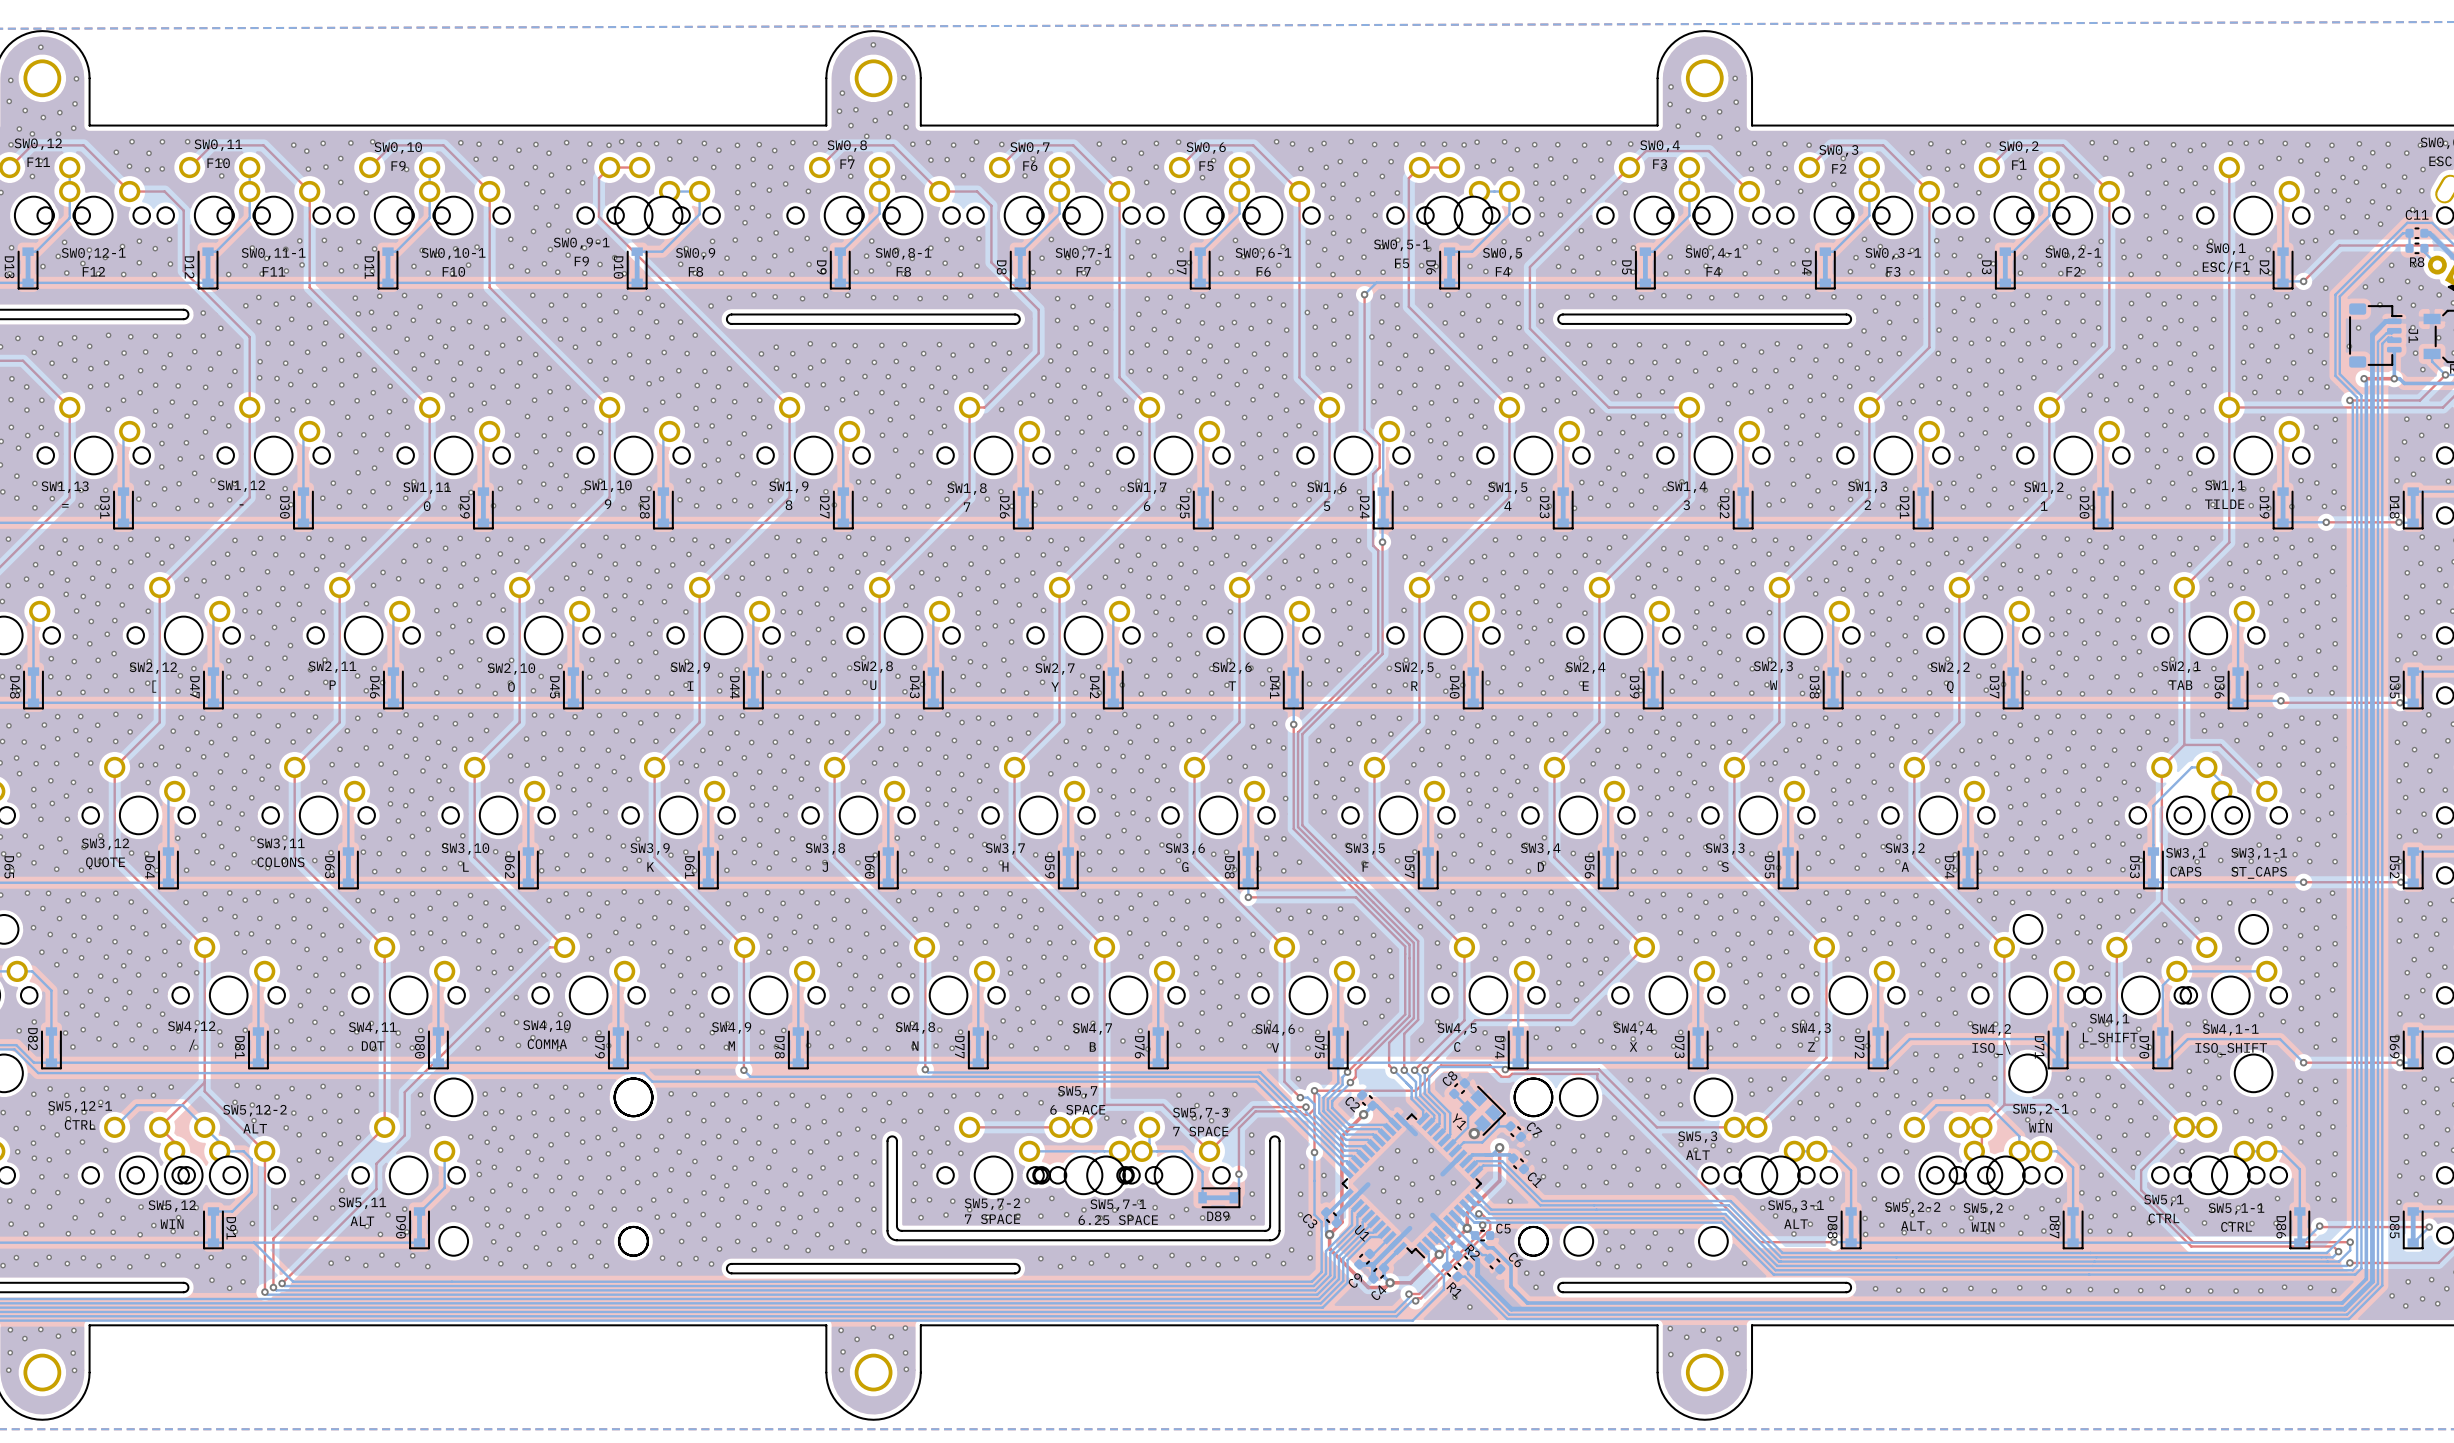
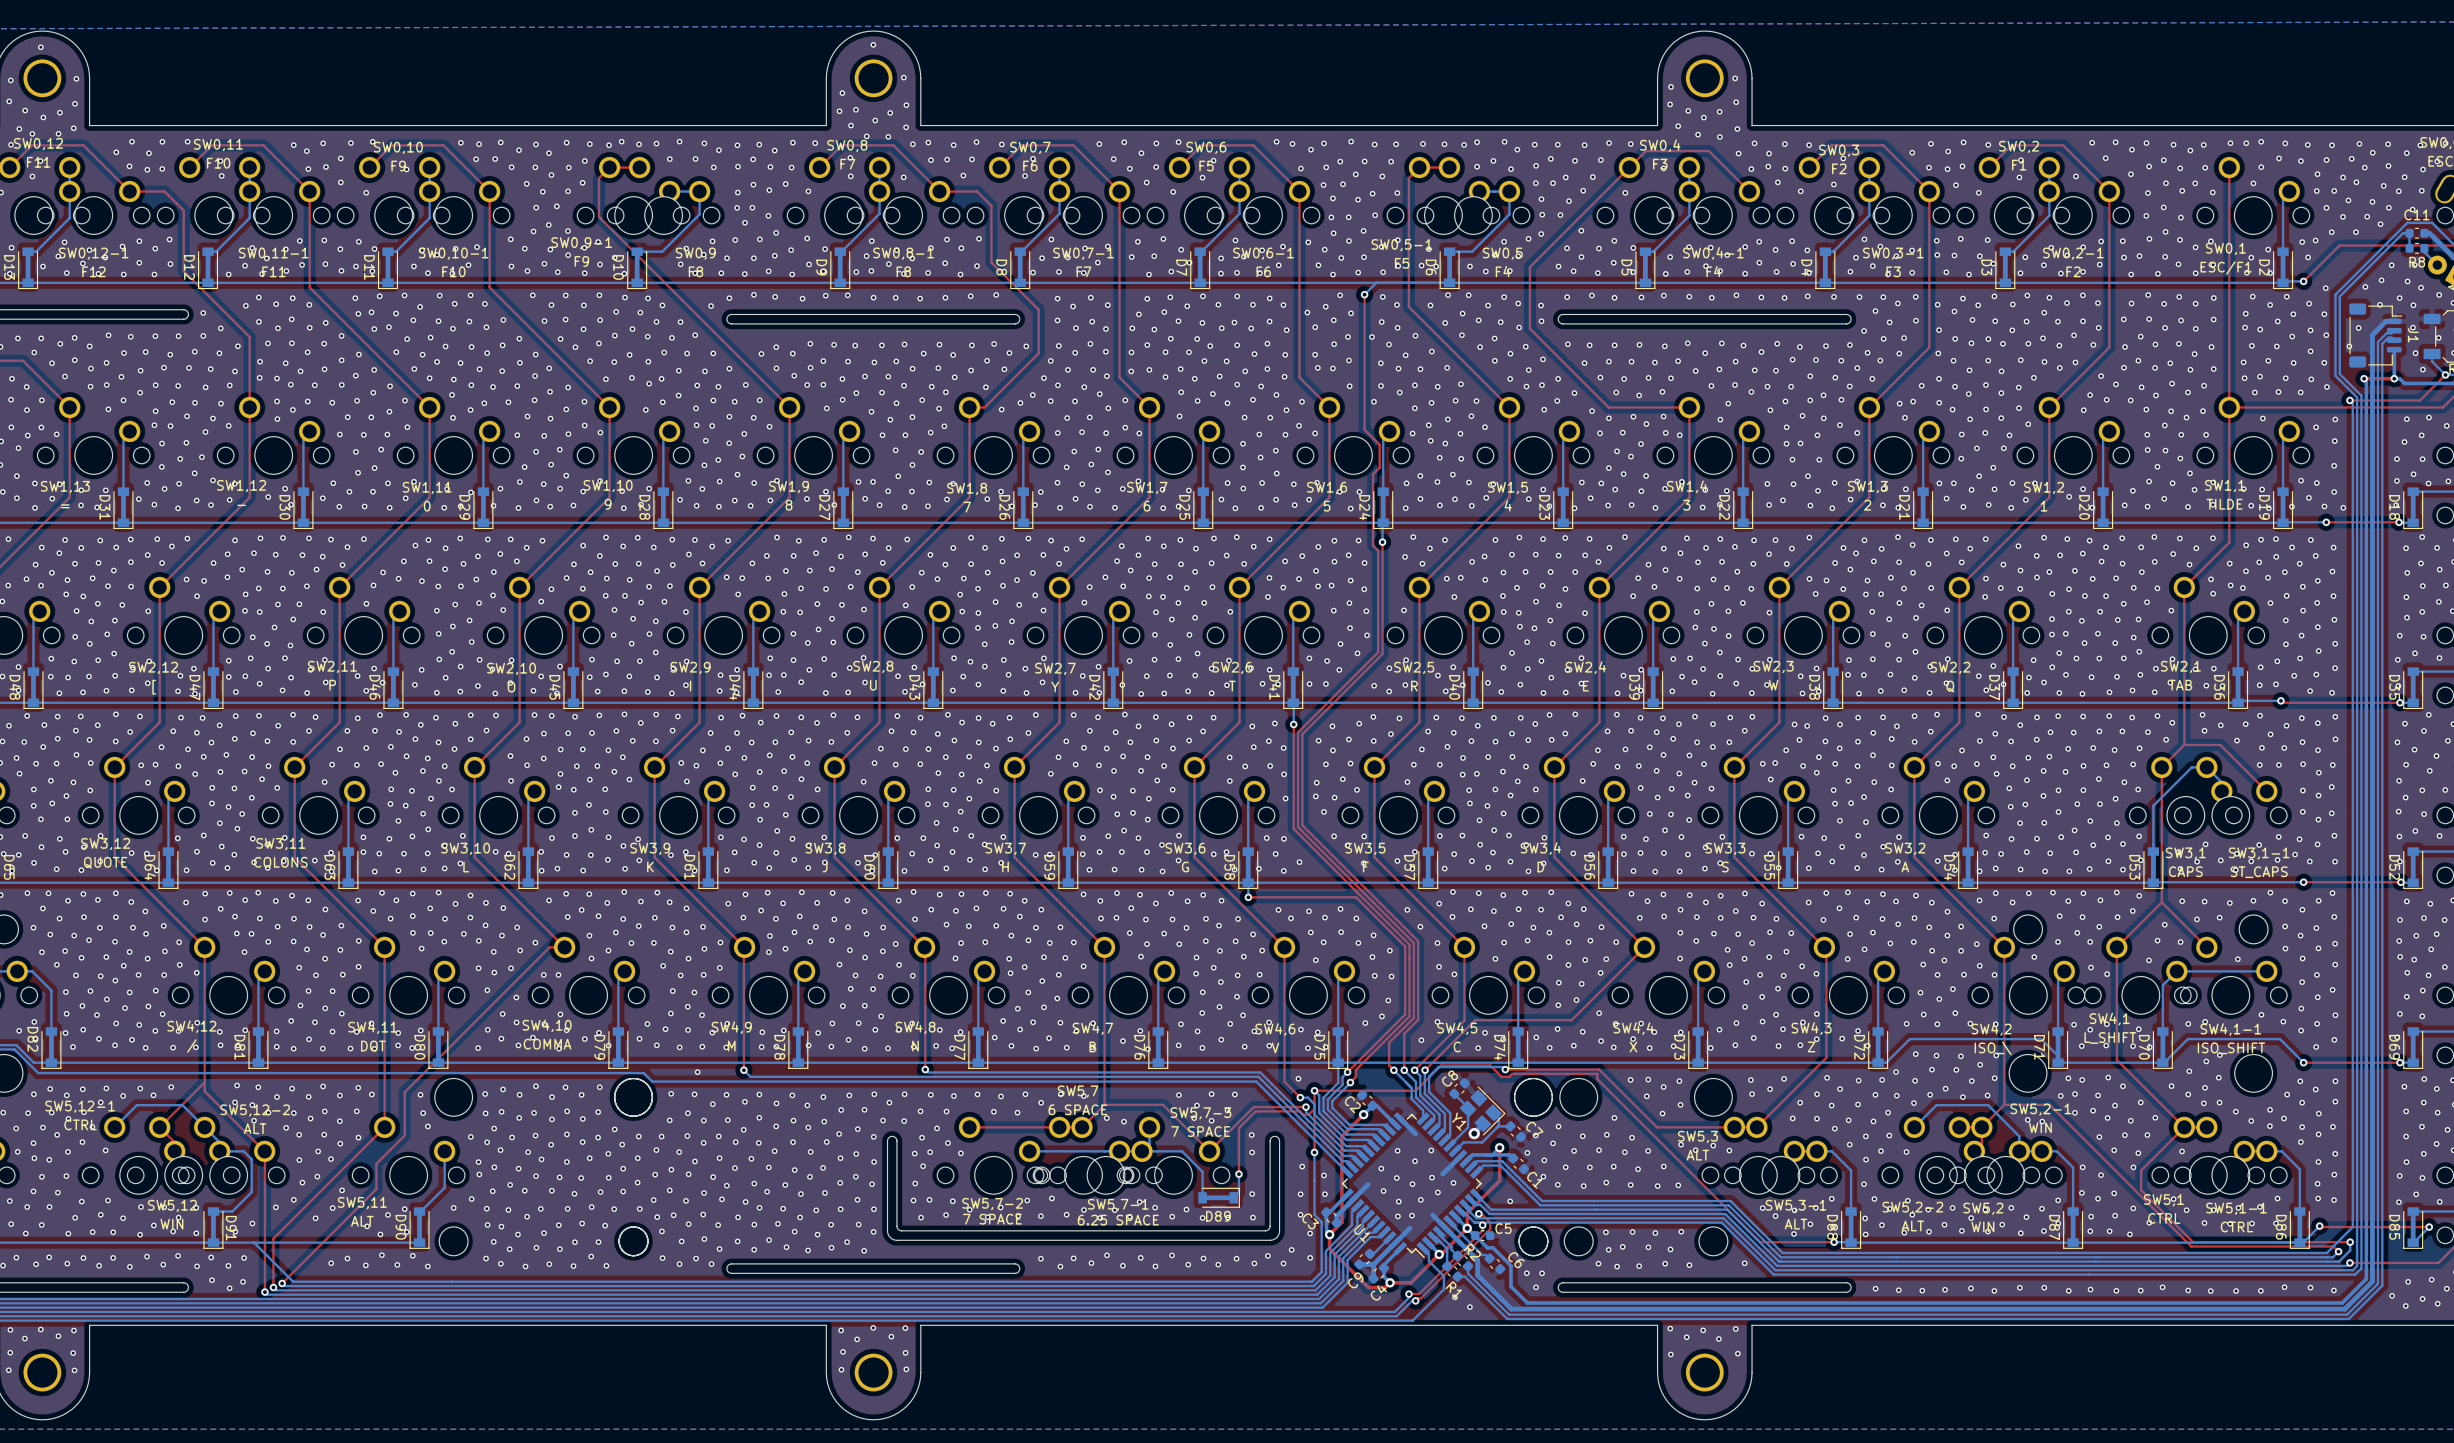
via: none -> (2428, 483)
via: none -> (962, 611)
via: none -> (2400, 956)

